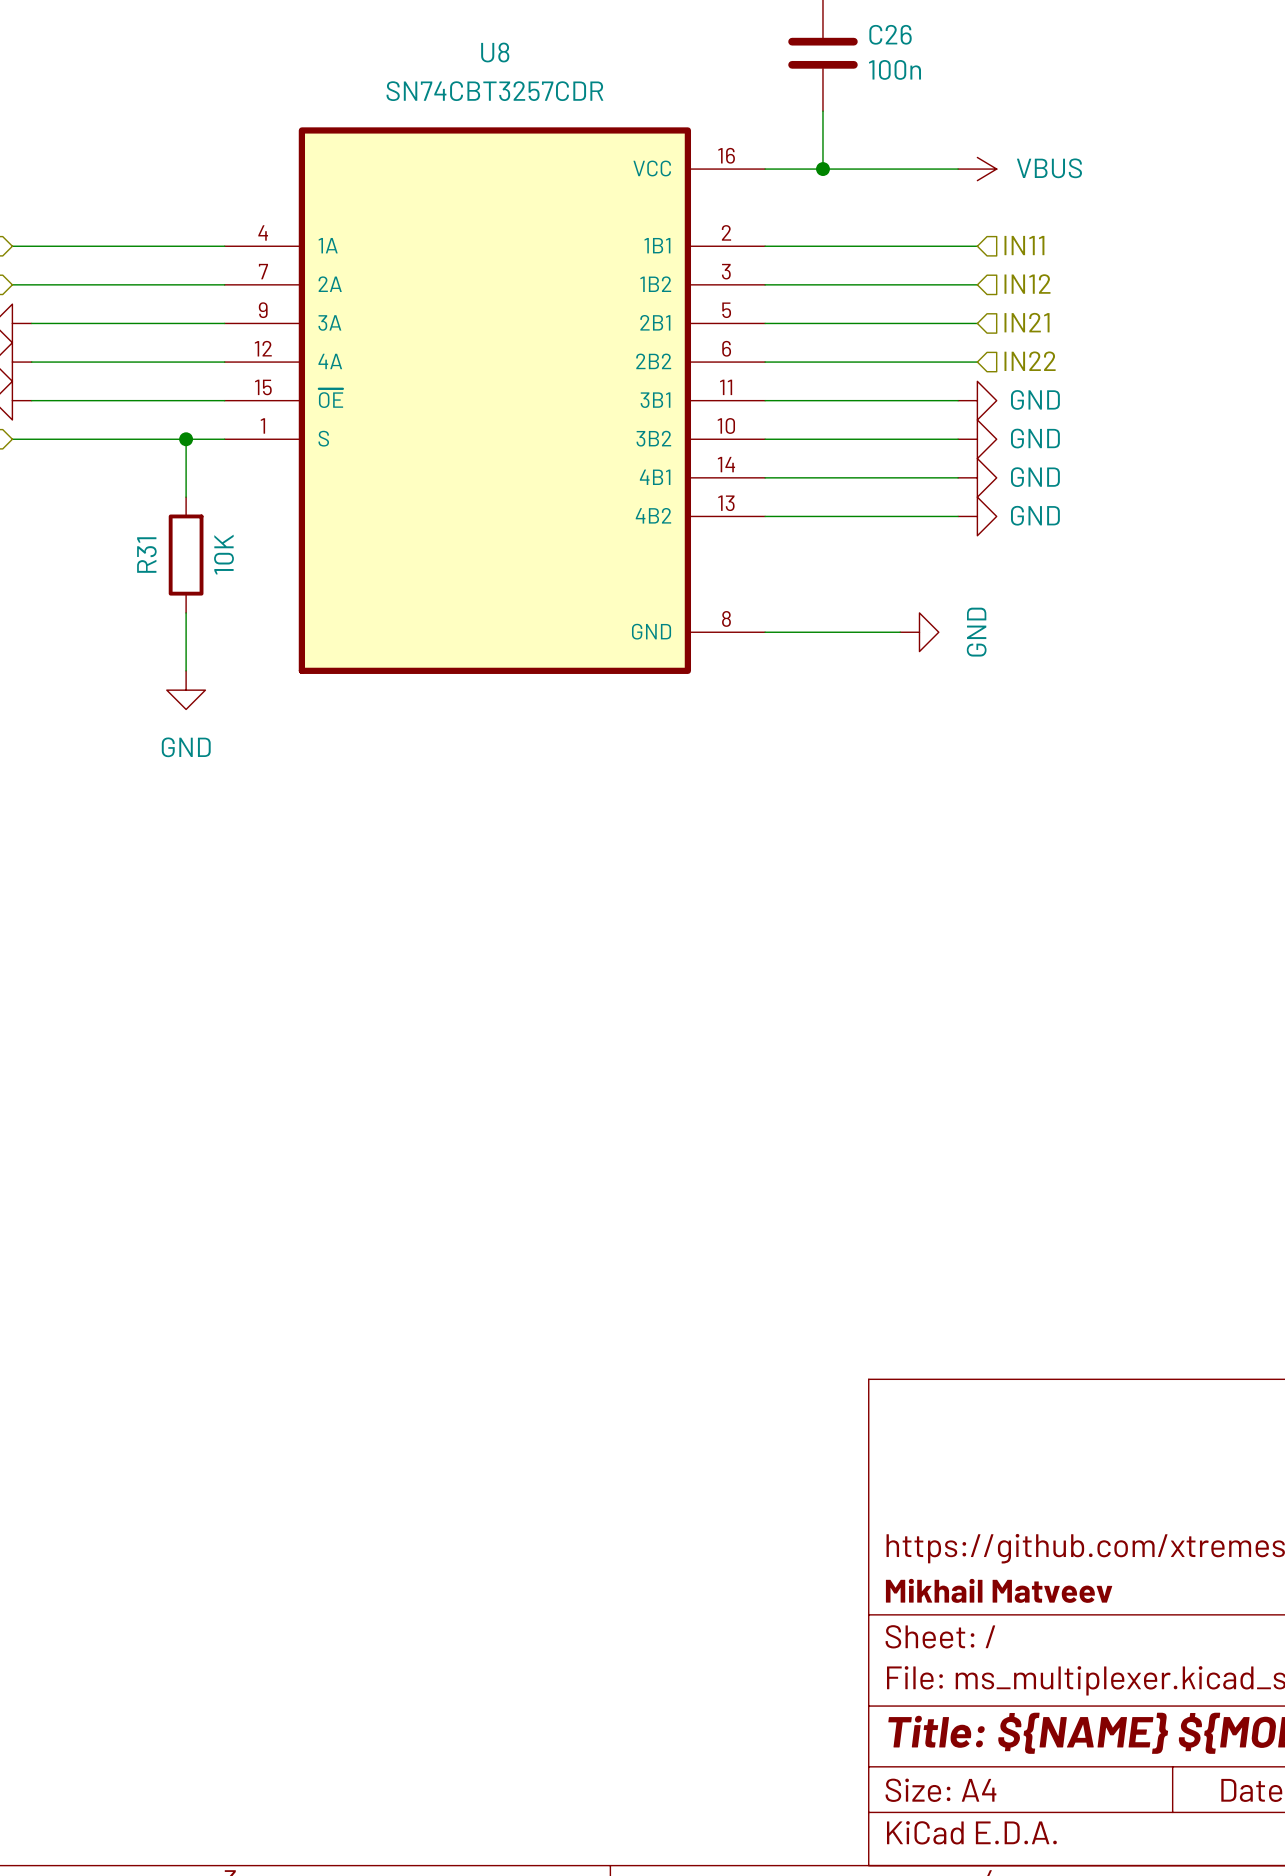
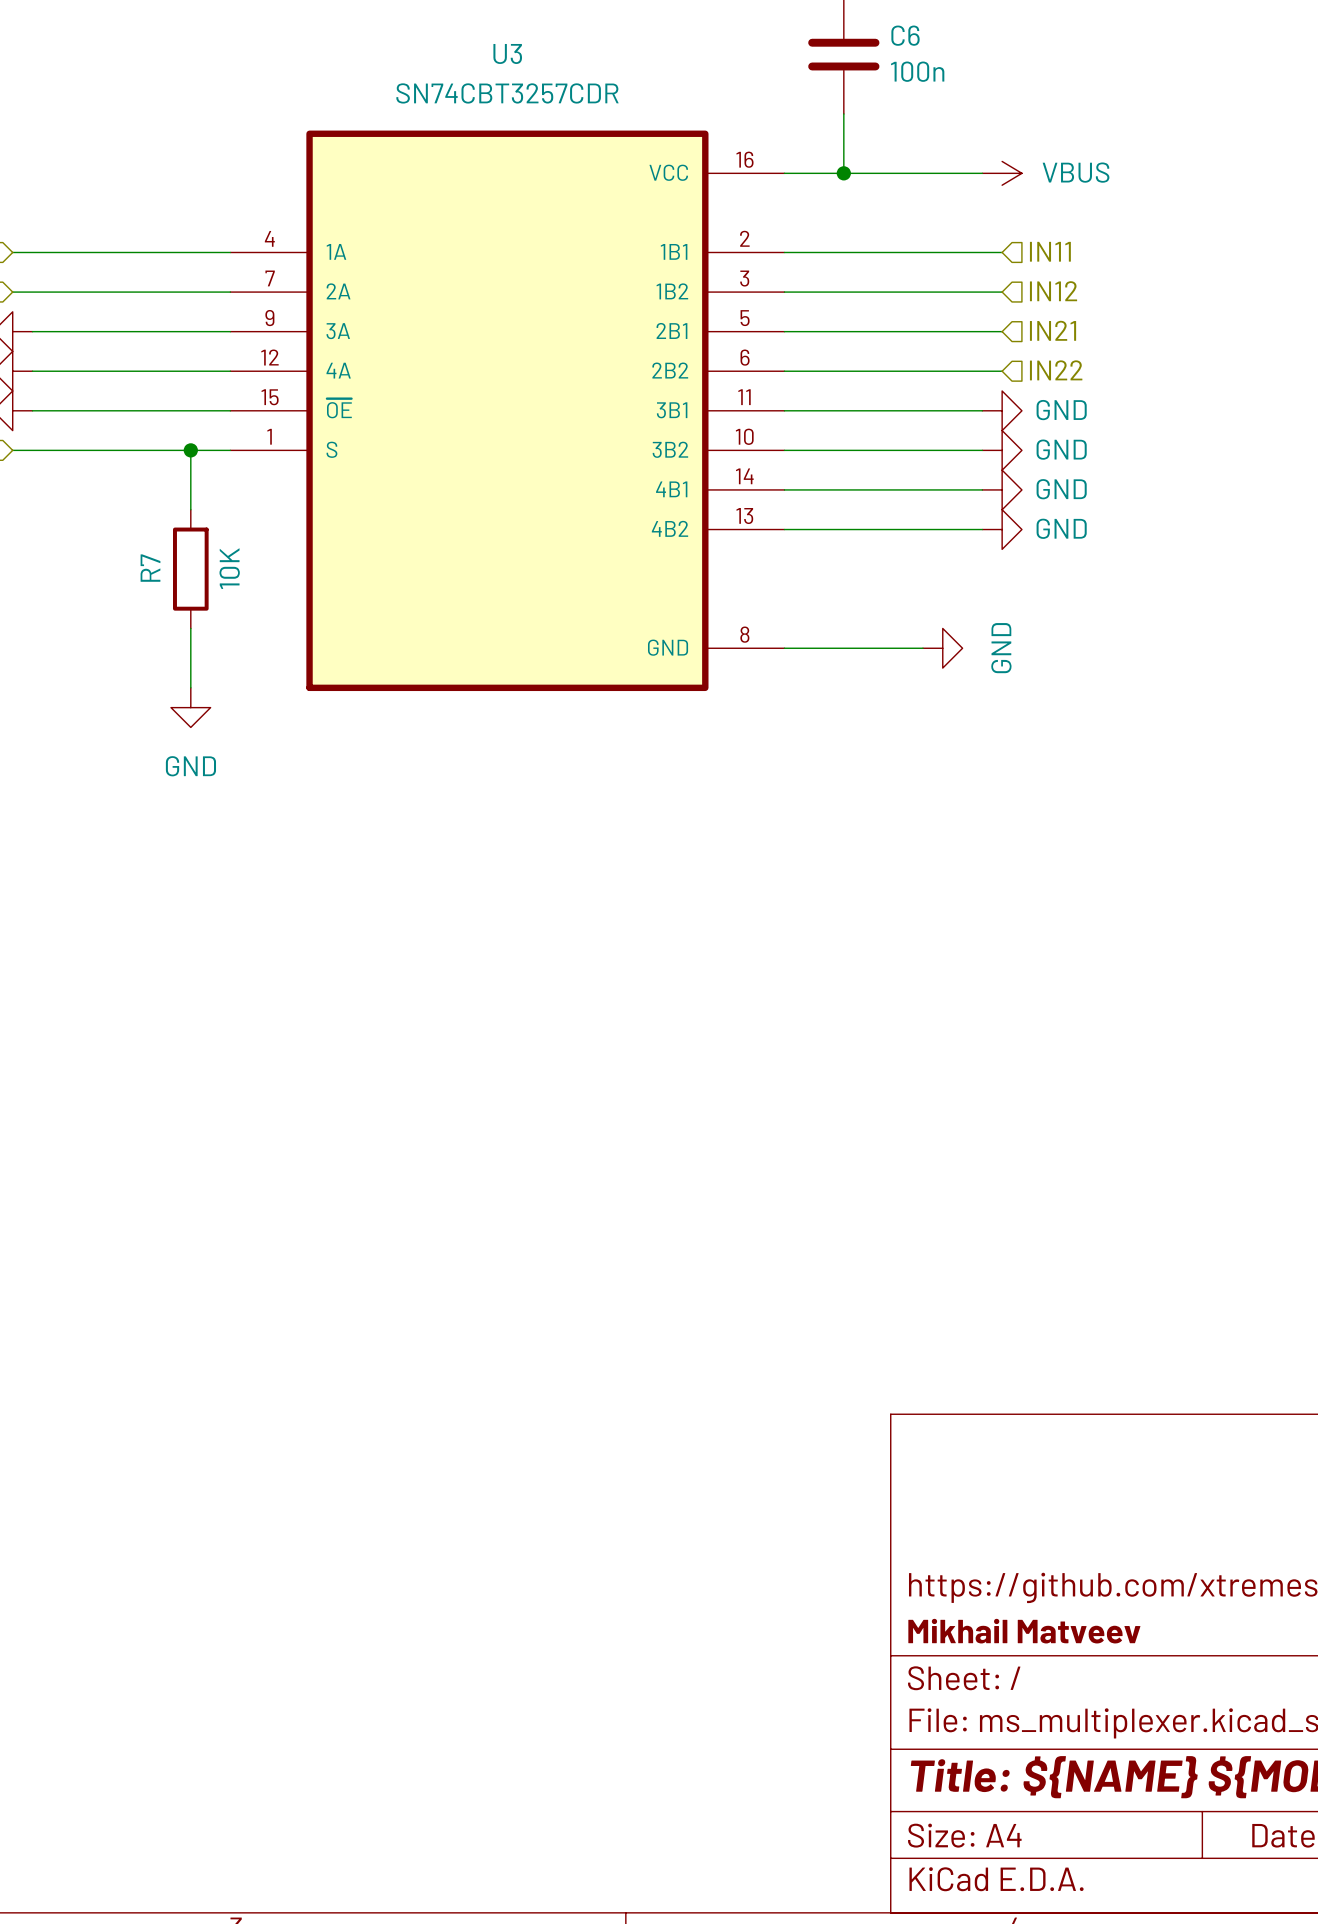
C26 name: C26 (890, 34) -> C6 (905, 35)
U8 name: U8 (495, 52) -> U3 (507, 53)
R31 name: R31 (146, 555) -> R7 (150, 568)

